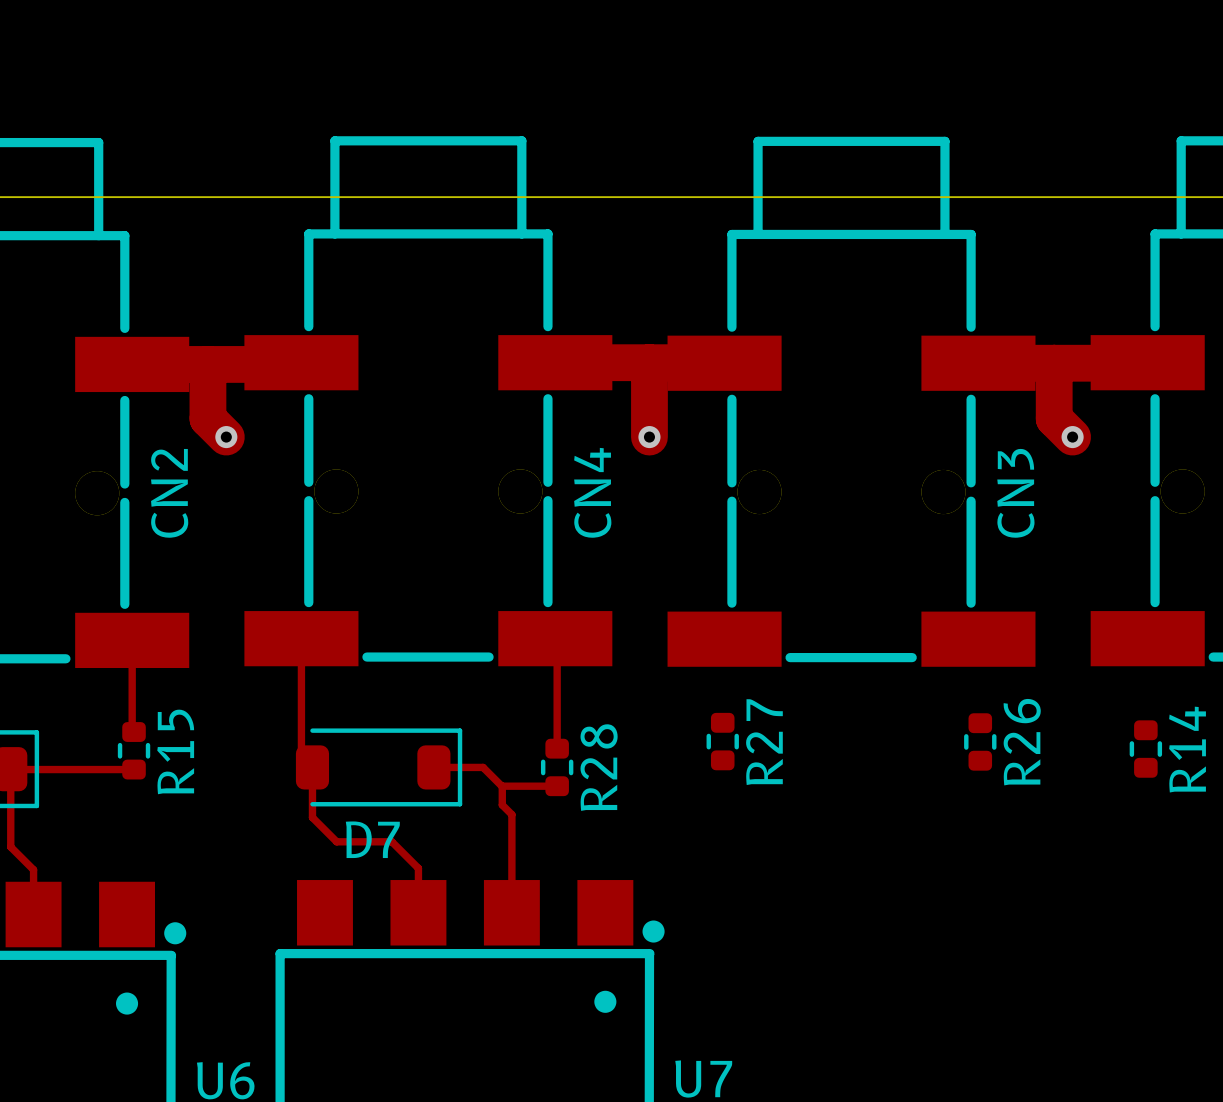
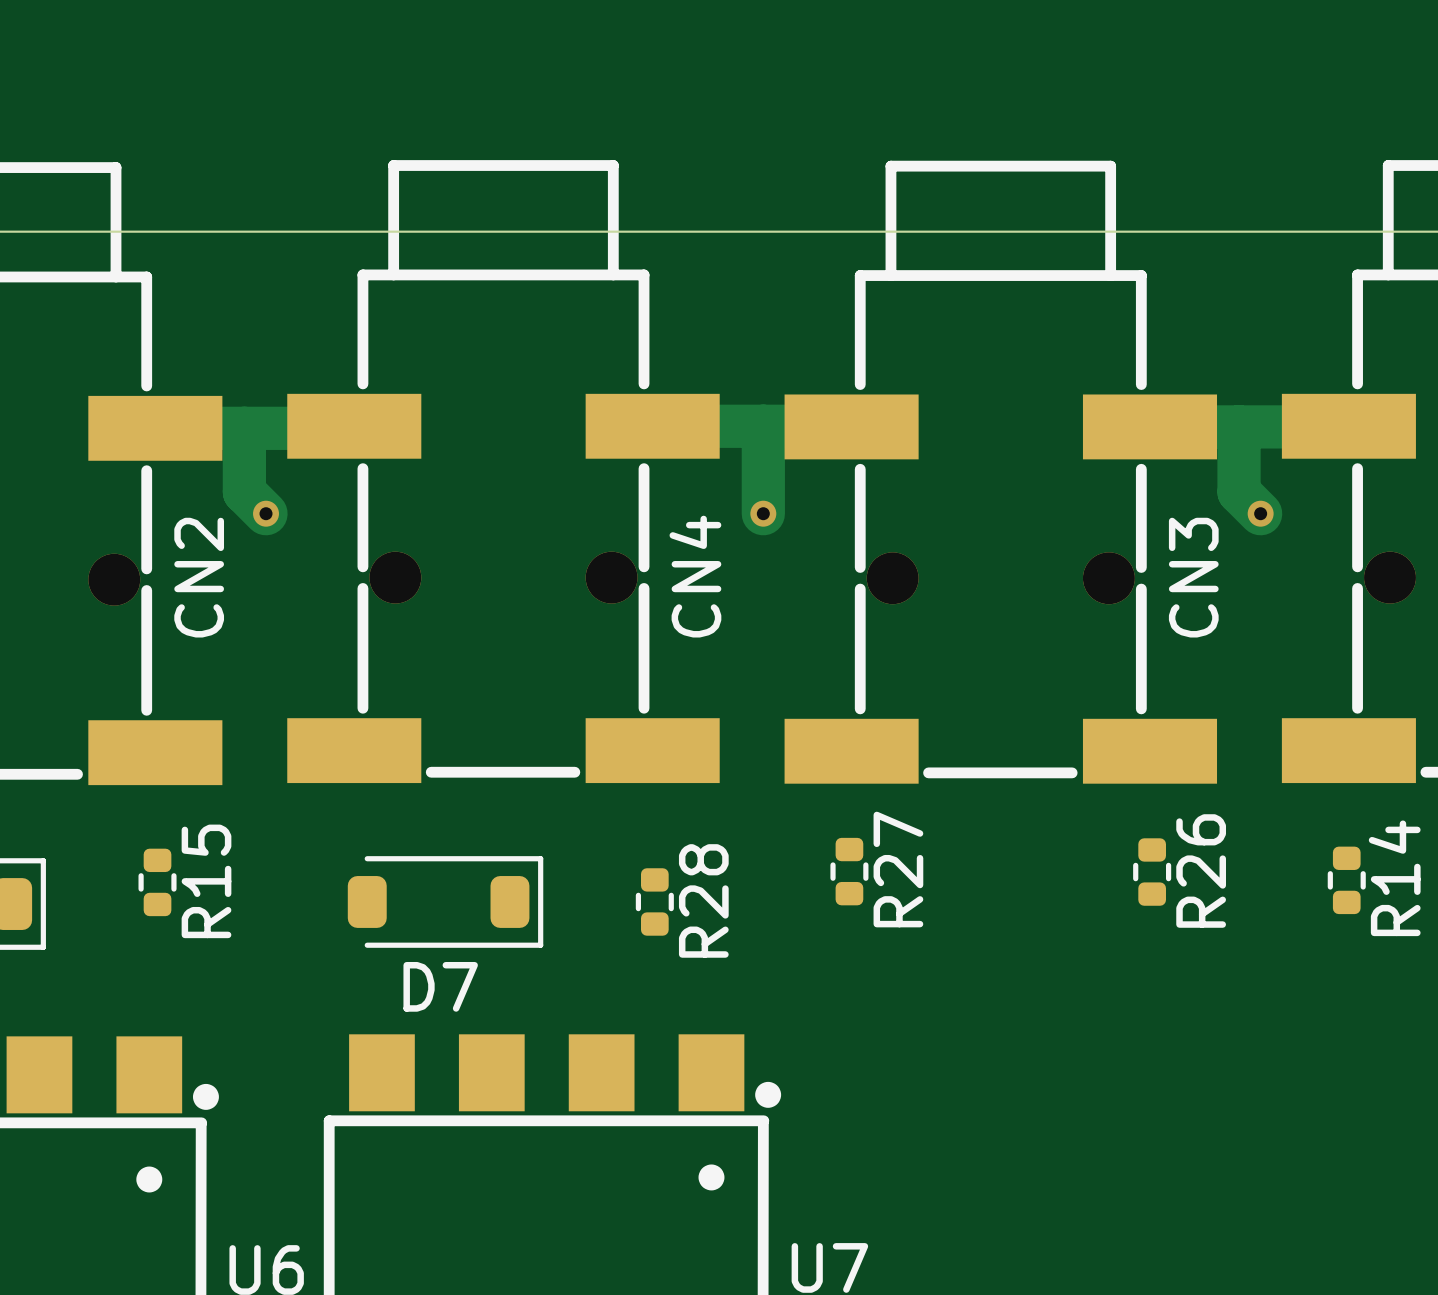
track: (301, 638) (301, 756) (312, 767) (312, 817) (336, 841) (391, 841) (418, 868) (418, 912) -> none
track: (555, 638) (557, 640) (557, 748) -> none
track: (132, 640) (132, 730) (134, 732) -> none
track: (433, 767) (483, 767) (502, 786) (502, 805) (511, 814) (511, 912) -> none
track: (10, 769) (10, 847) (33, 869) (33, 914) -> none
track: (11, 769) (134, 769) -> none
track: (502, 786) (557, 786) -> none

